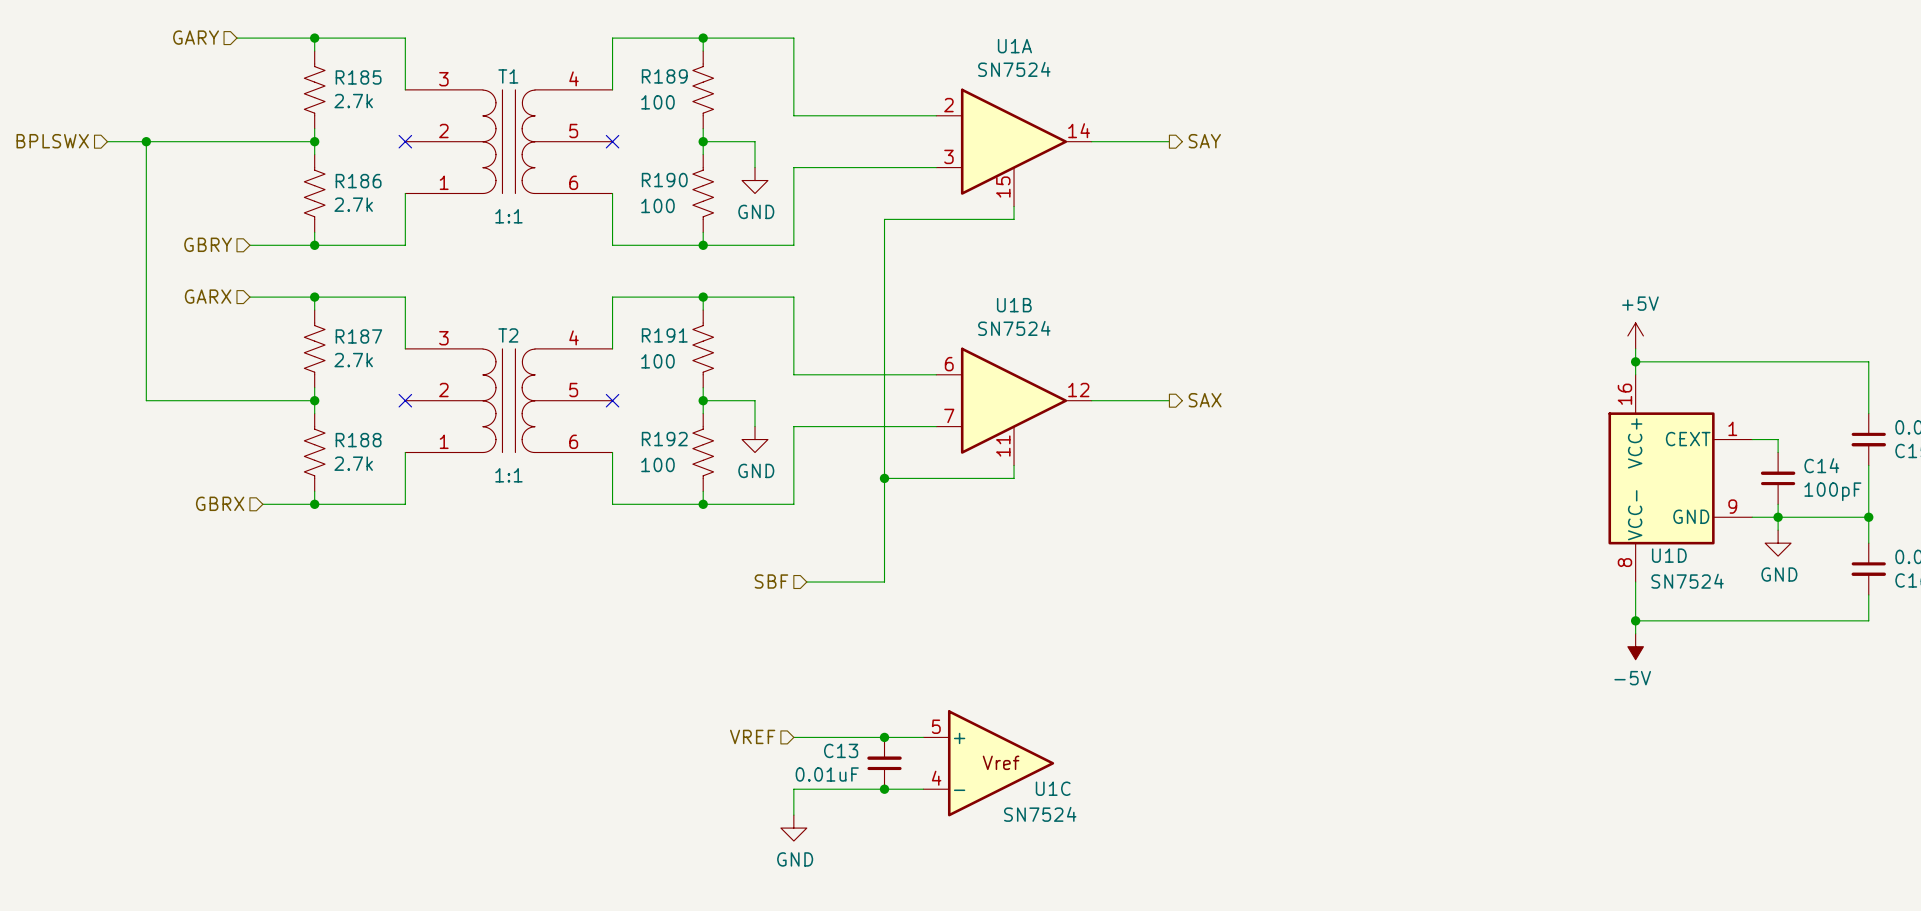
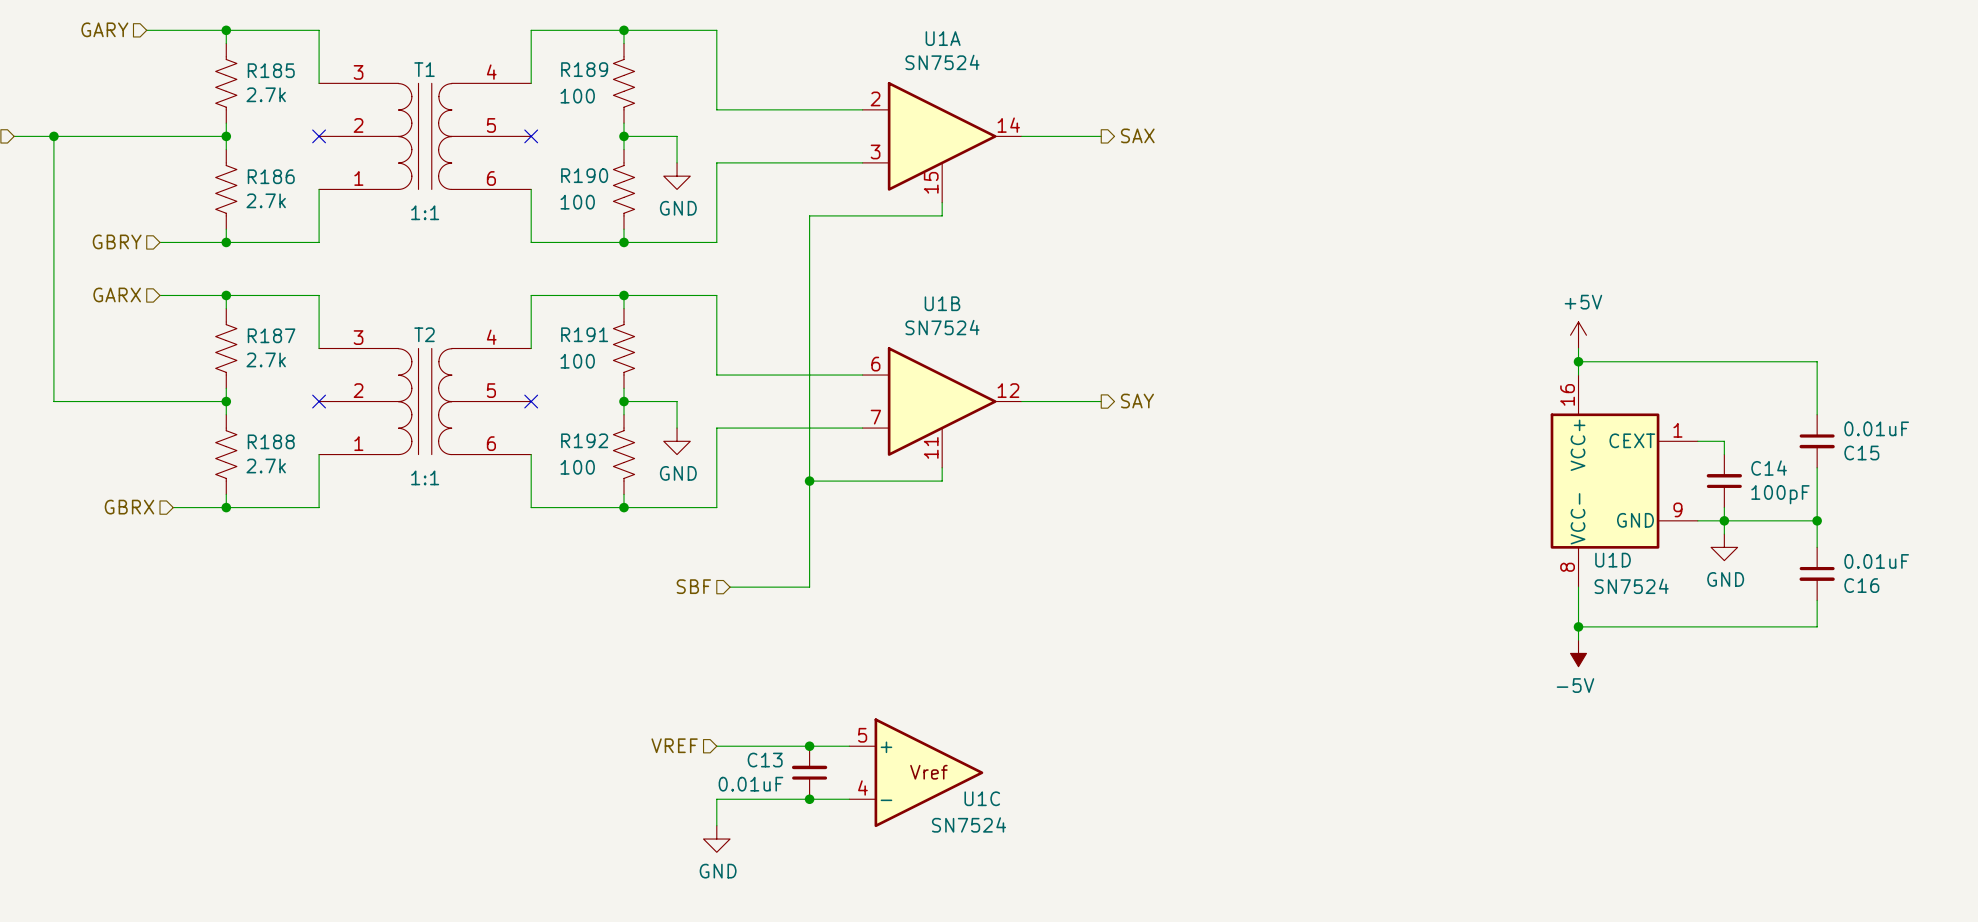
hierarchical label: SAY (1204, 141) -> SAX (1137, 135)
hierarchical label: SAX (1205, 400) -> SAY (1137, 401)

